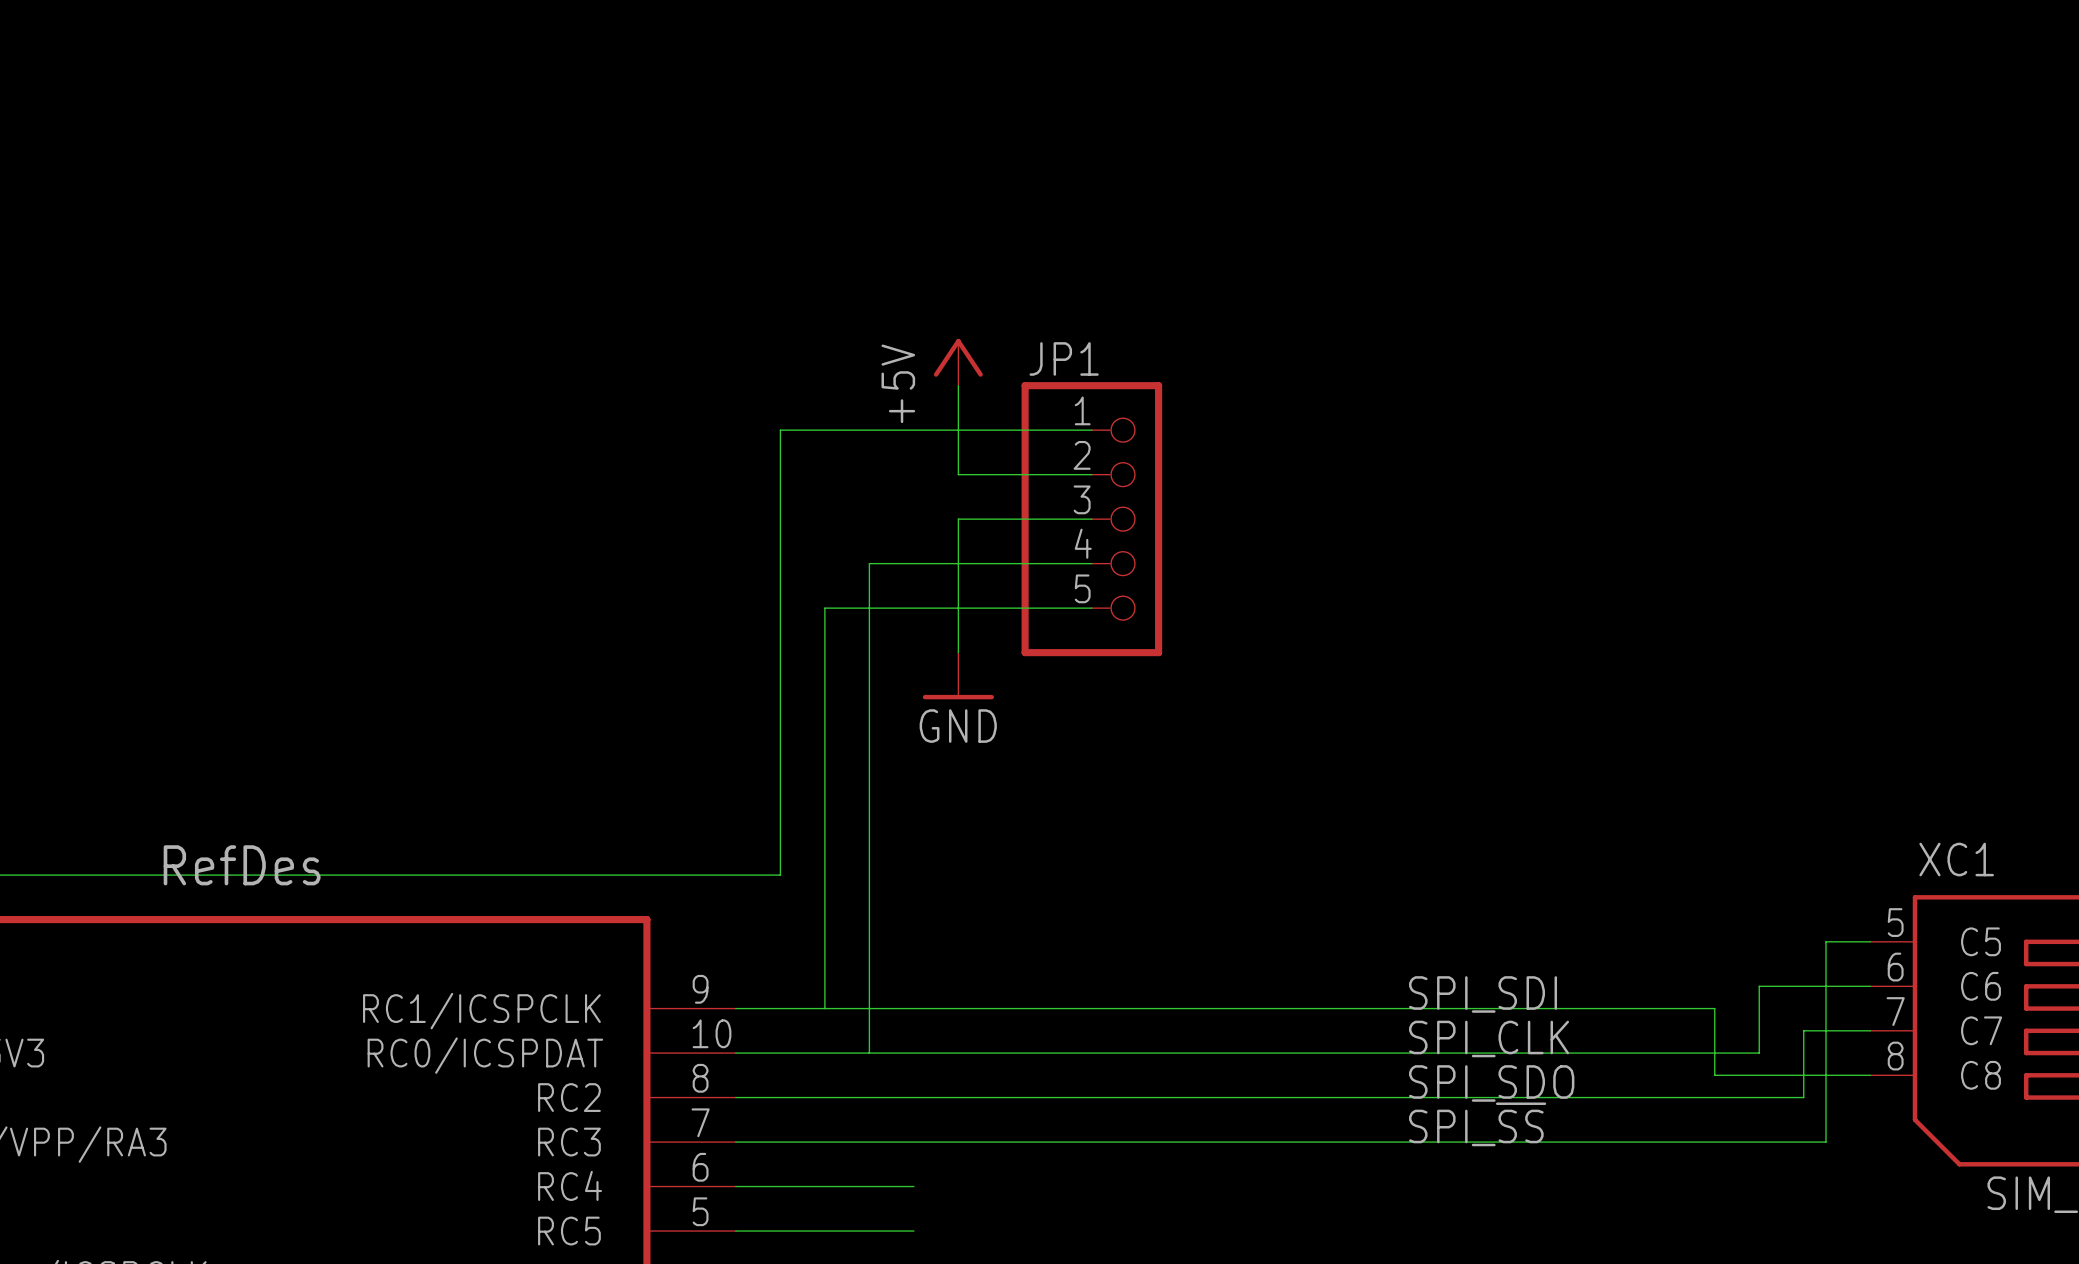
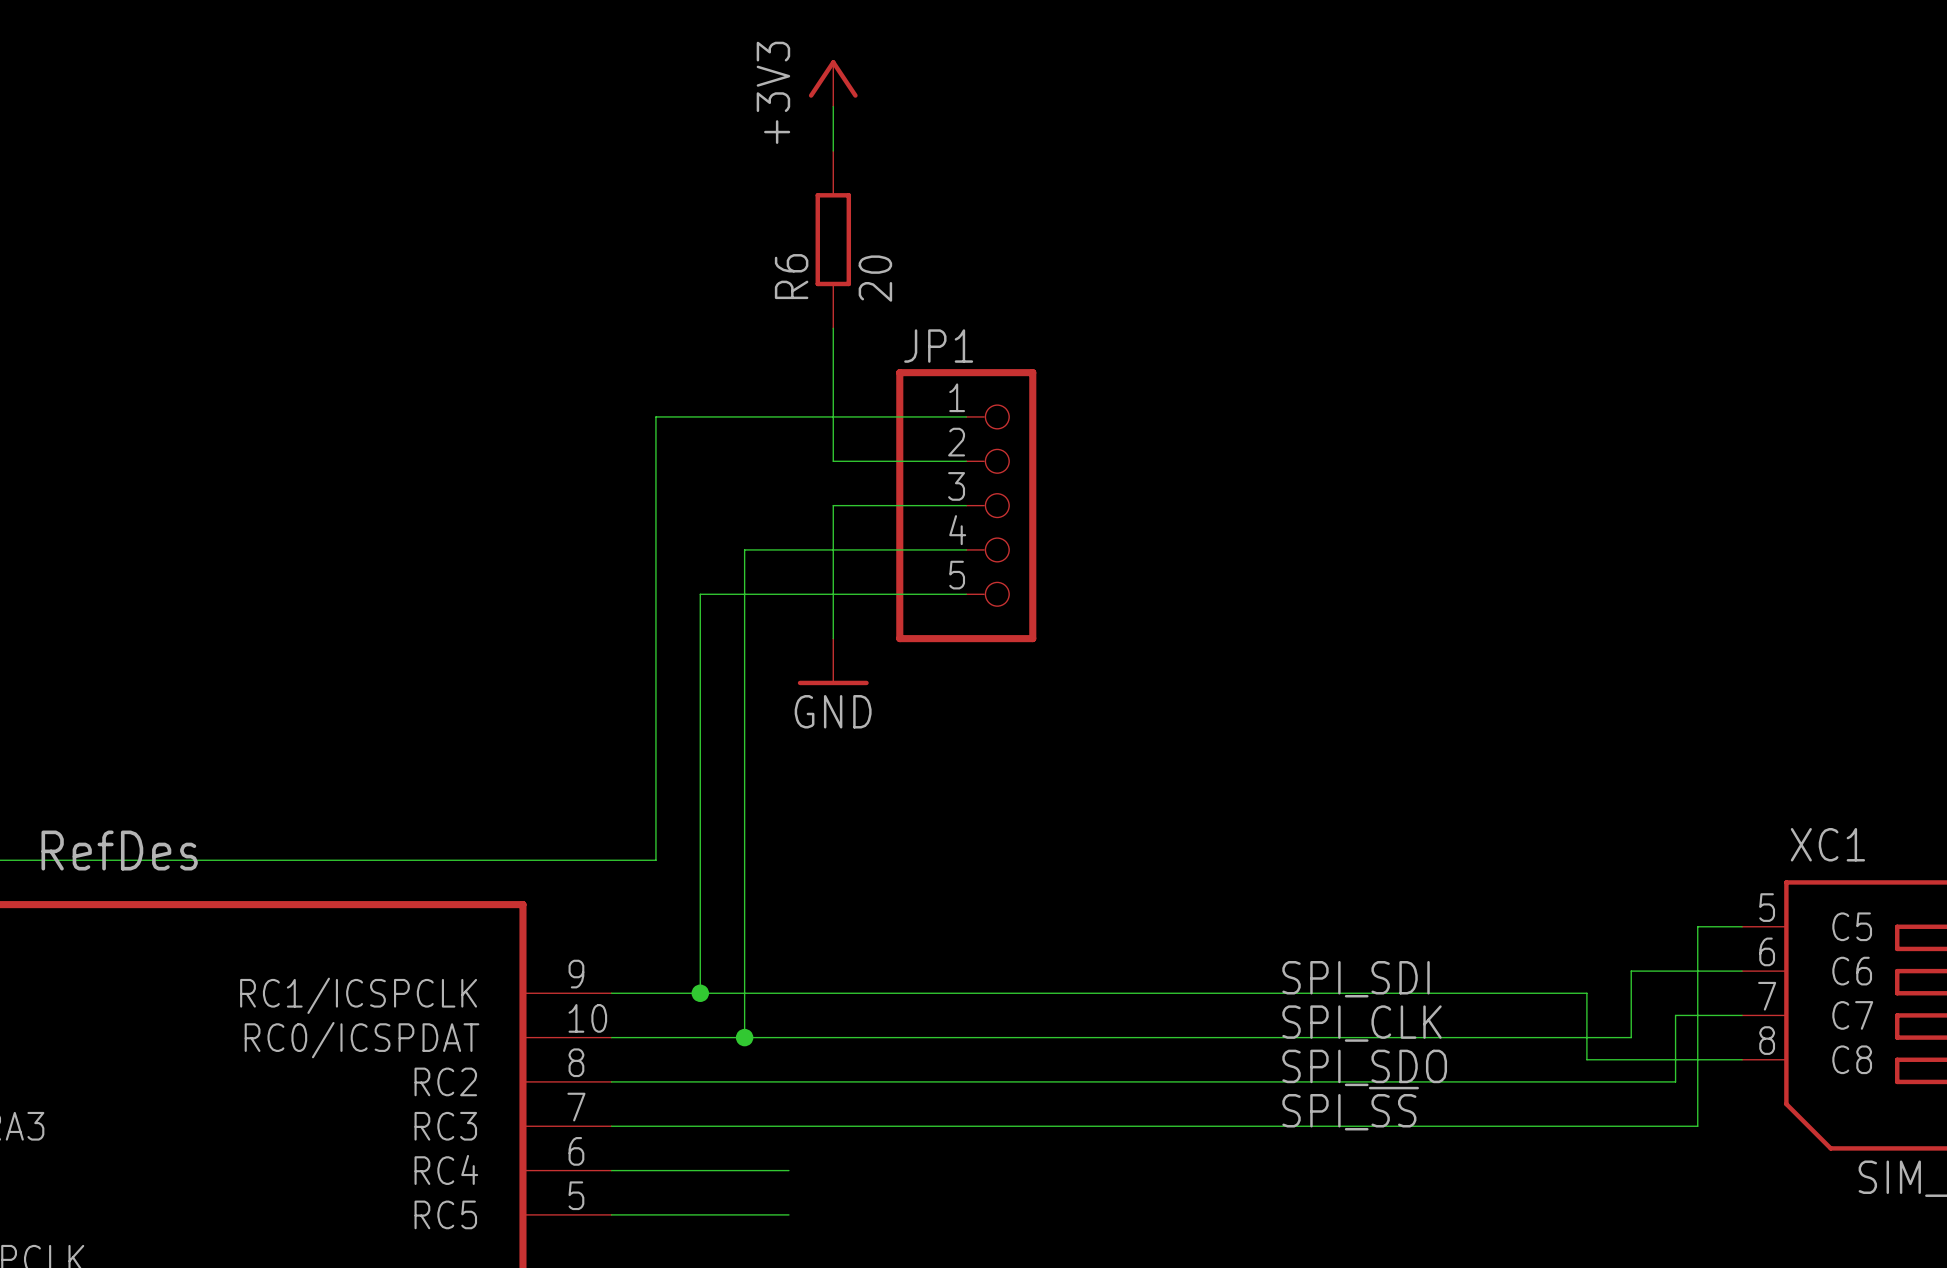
power symbol: none -> +3V3 (833, 83)
wire: none -> (833, 106) (833, 150)
R6: none -> 20 (833, 239)
power symbol: +5V (958, 362) -> none
junction: none -> (700, 993)
junction: none -> (744, 1037)

